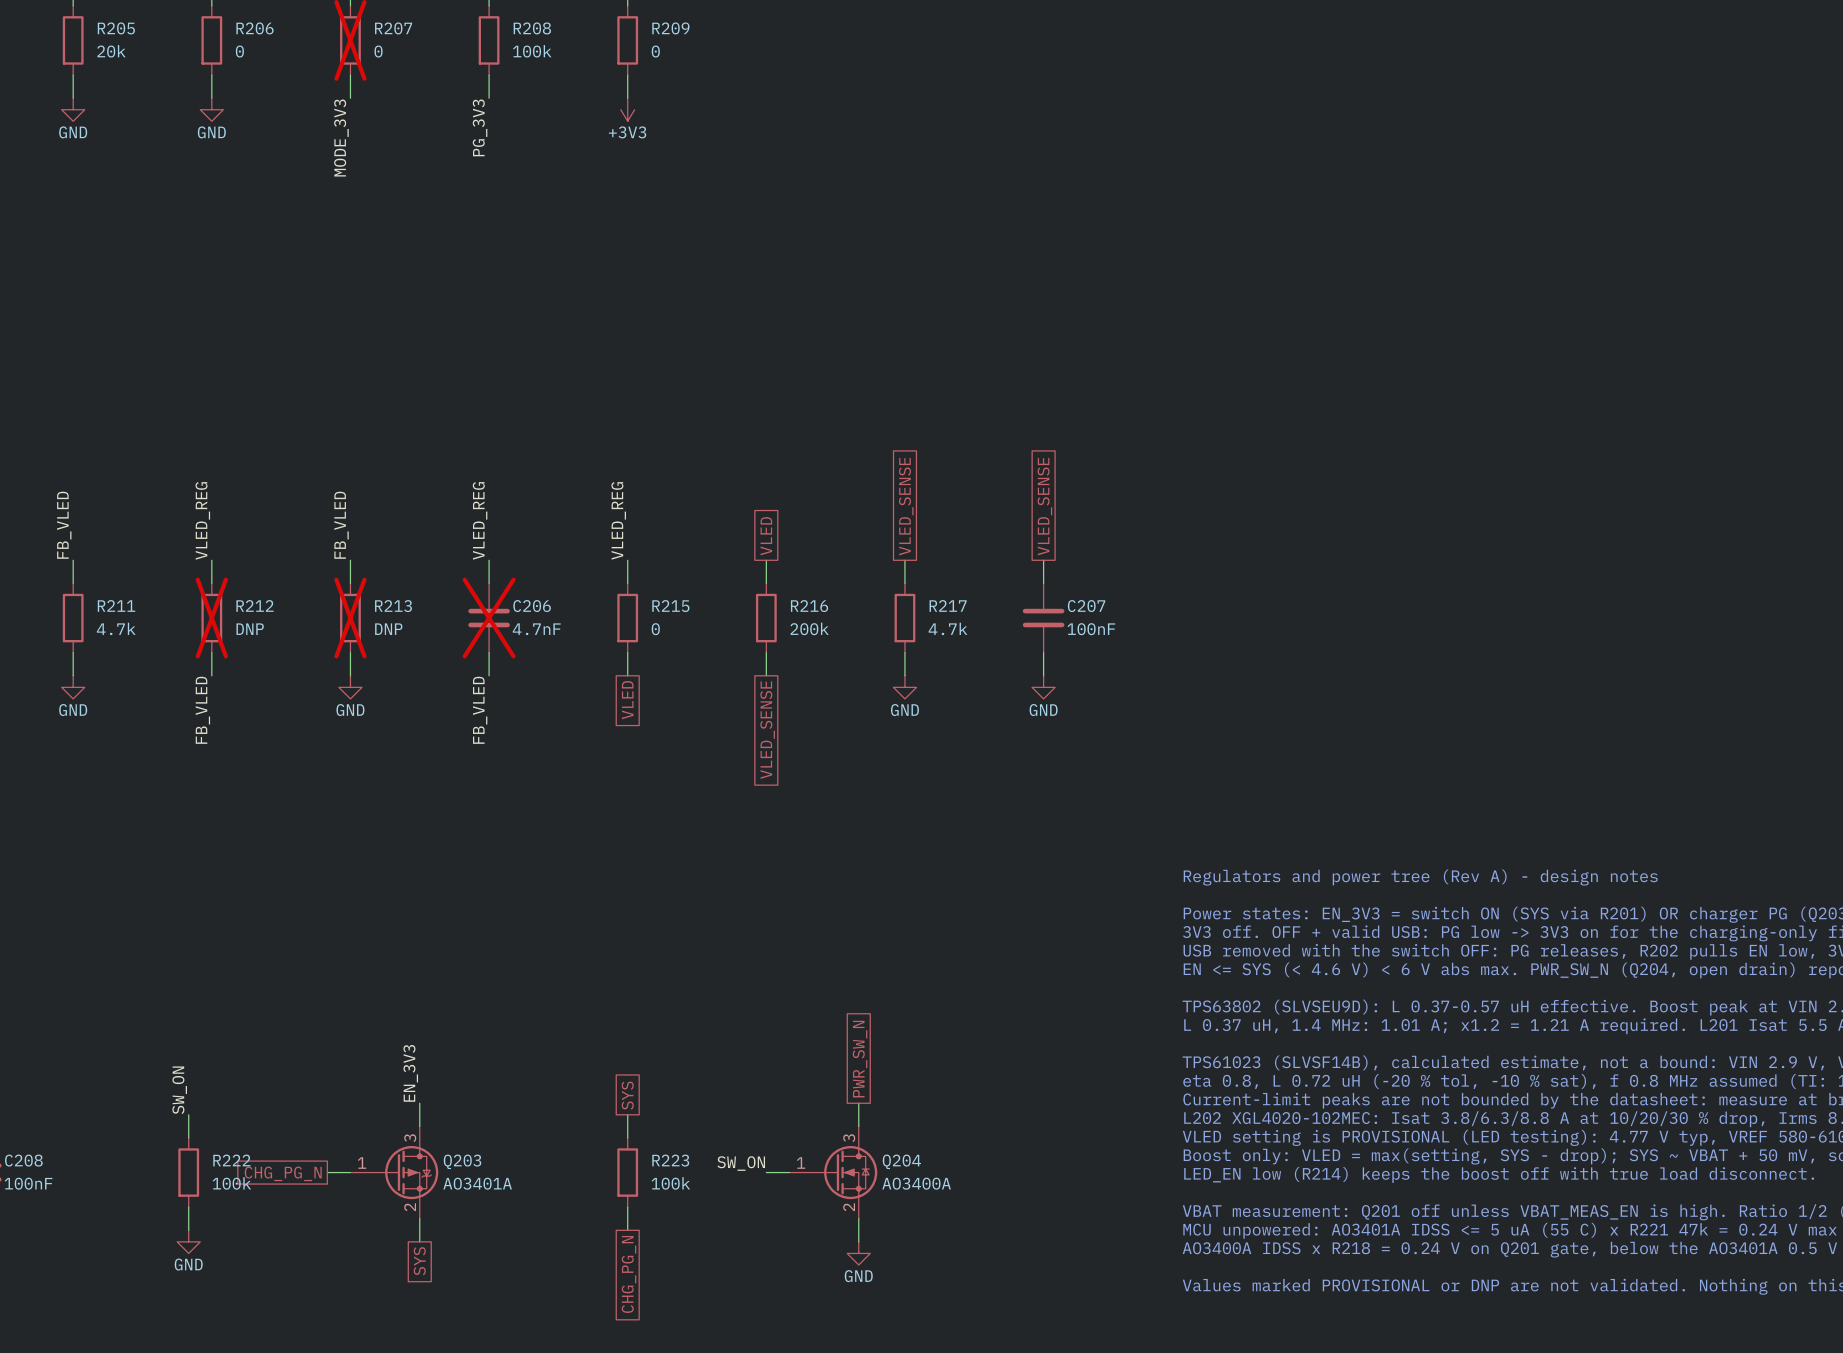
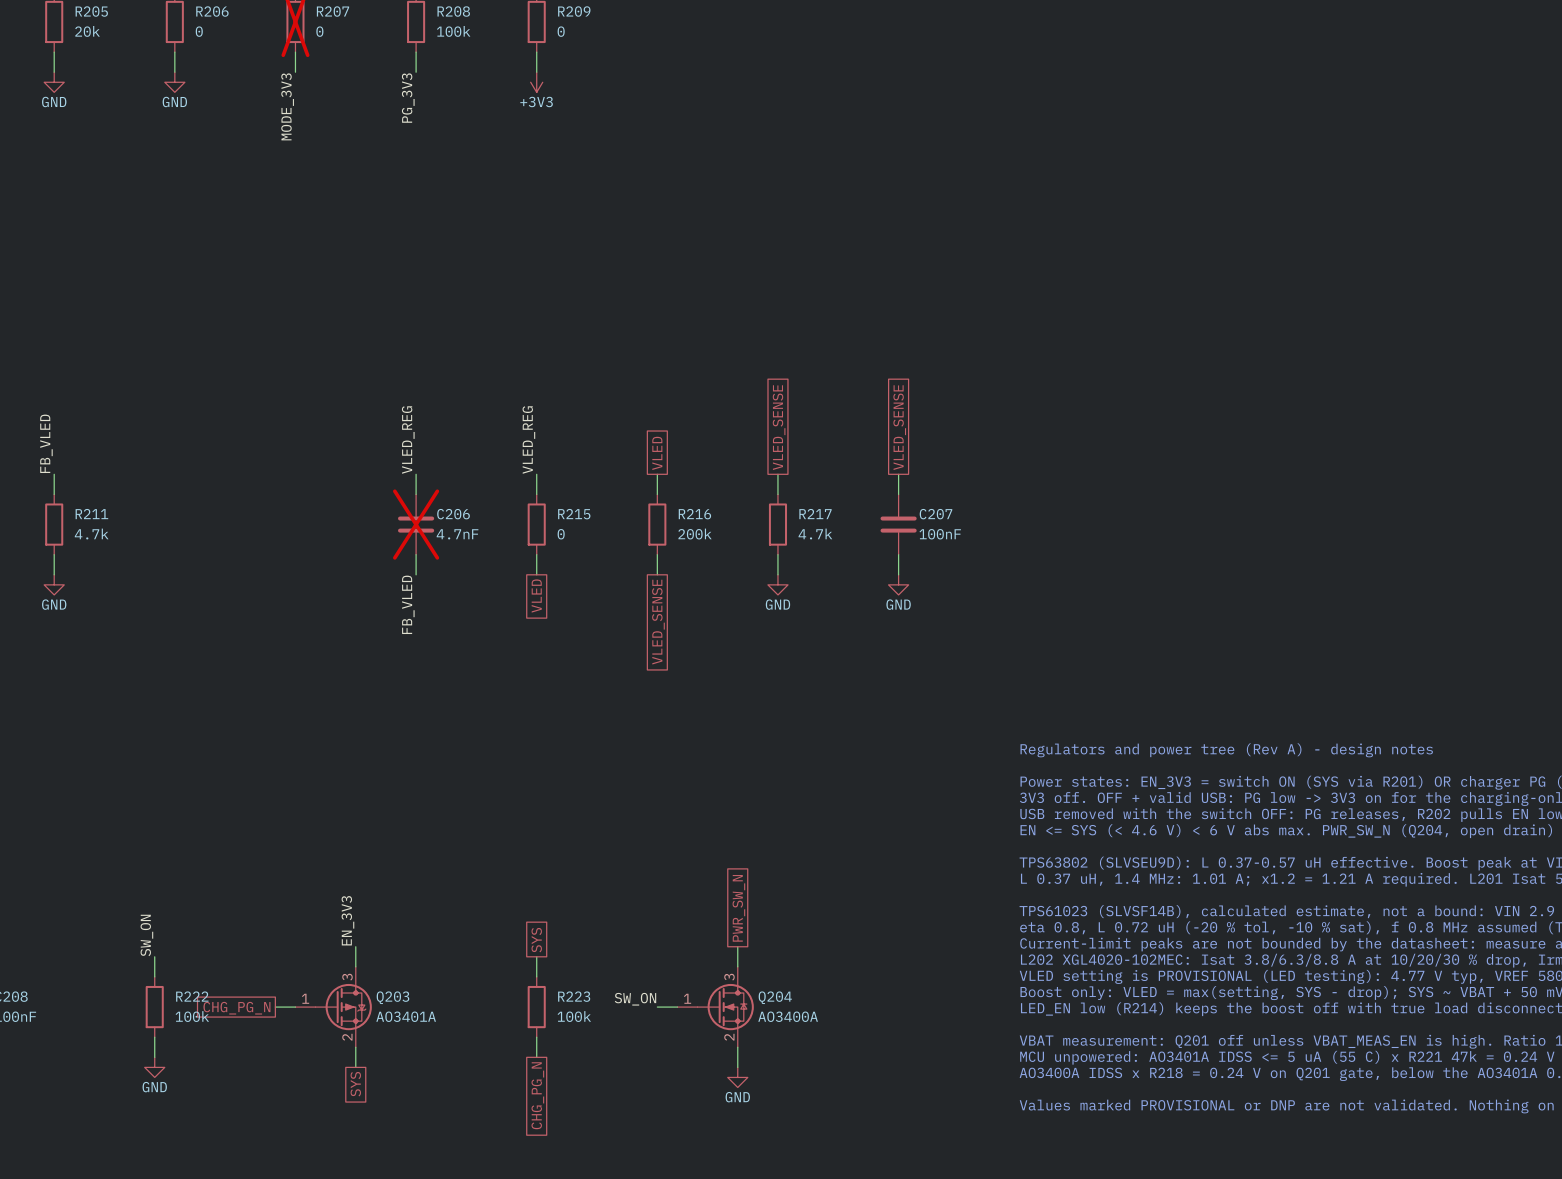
label: VLED_REG (202, 520) -> none
label: FB_VLED (341, 525) -> none
wire: (211, 560) (211, 583) -> none
wire: (350, 560) (350, 583) -> none
R212: DNP (211, 618) -> none
R213: DNP (350, 618) -> none
wire: (211, 652) (211, 675) -> none
wire: (350, 652) (350, 675) -> none
power symbol: GND (350, 687) -> none
label: FB_VLED (202, 710) -> none

